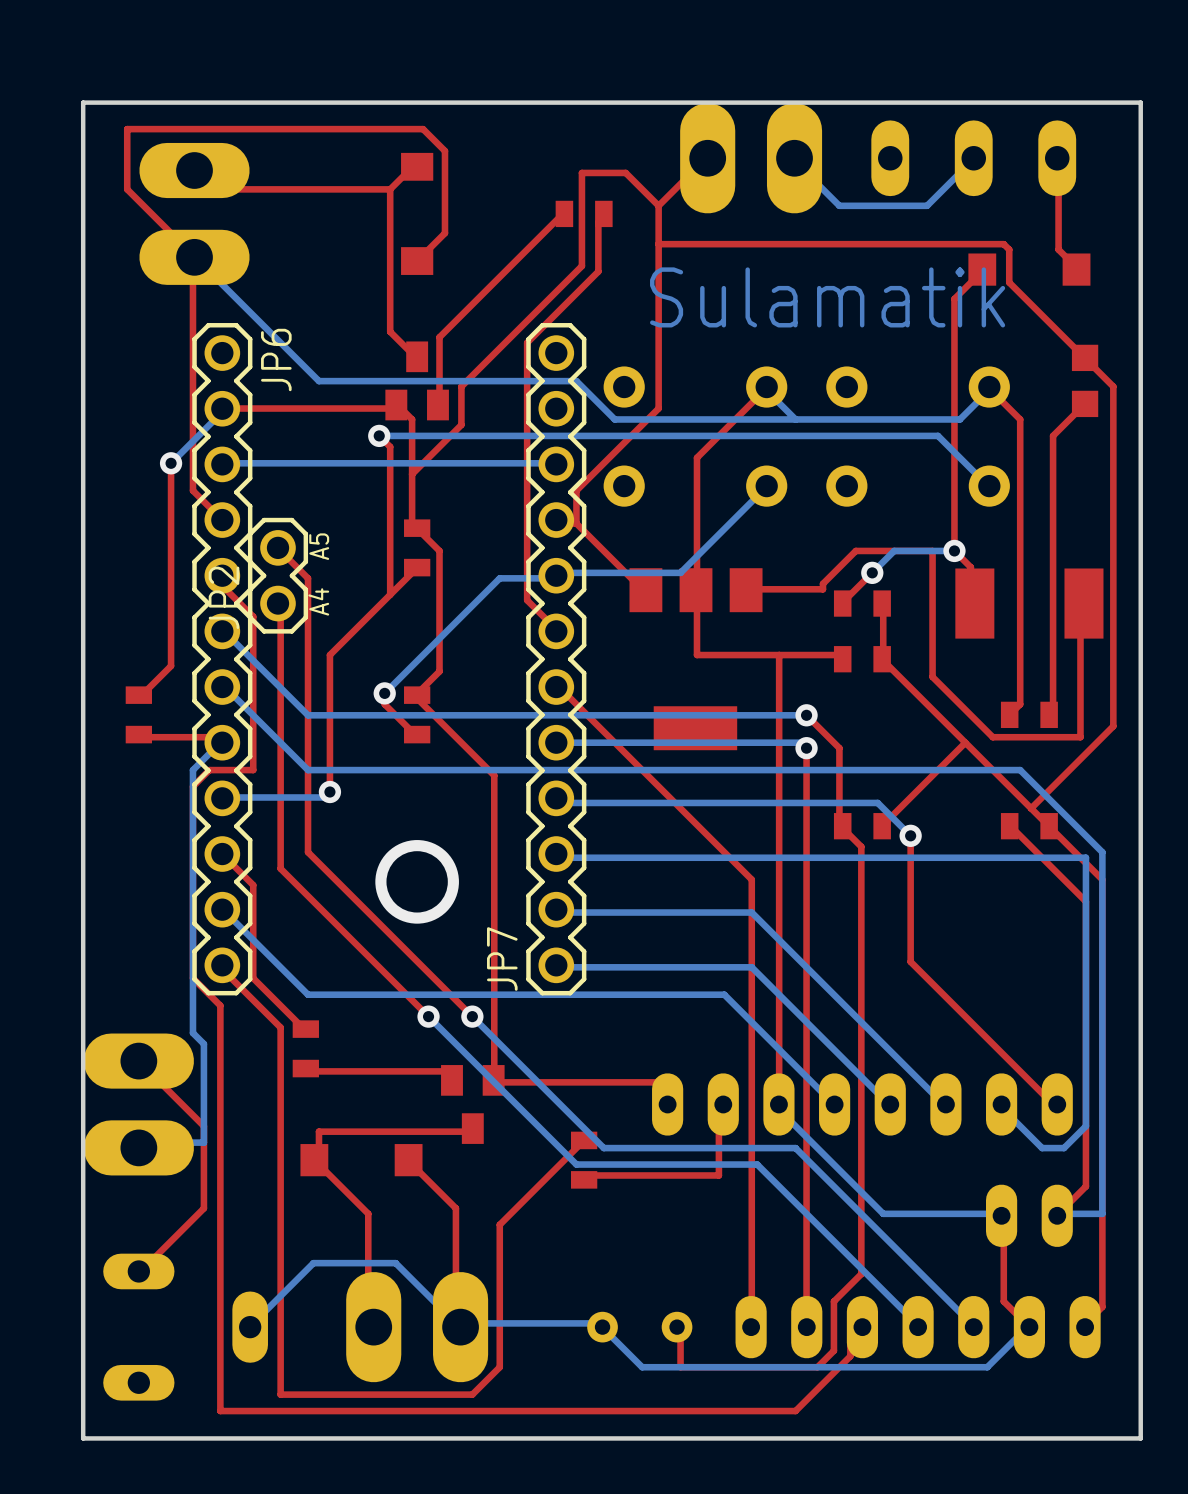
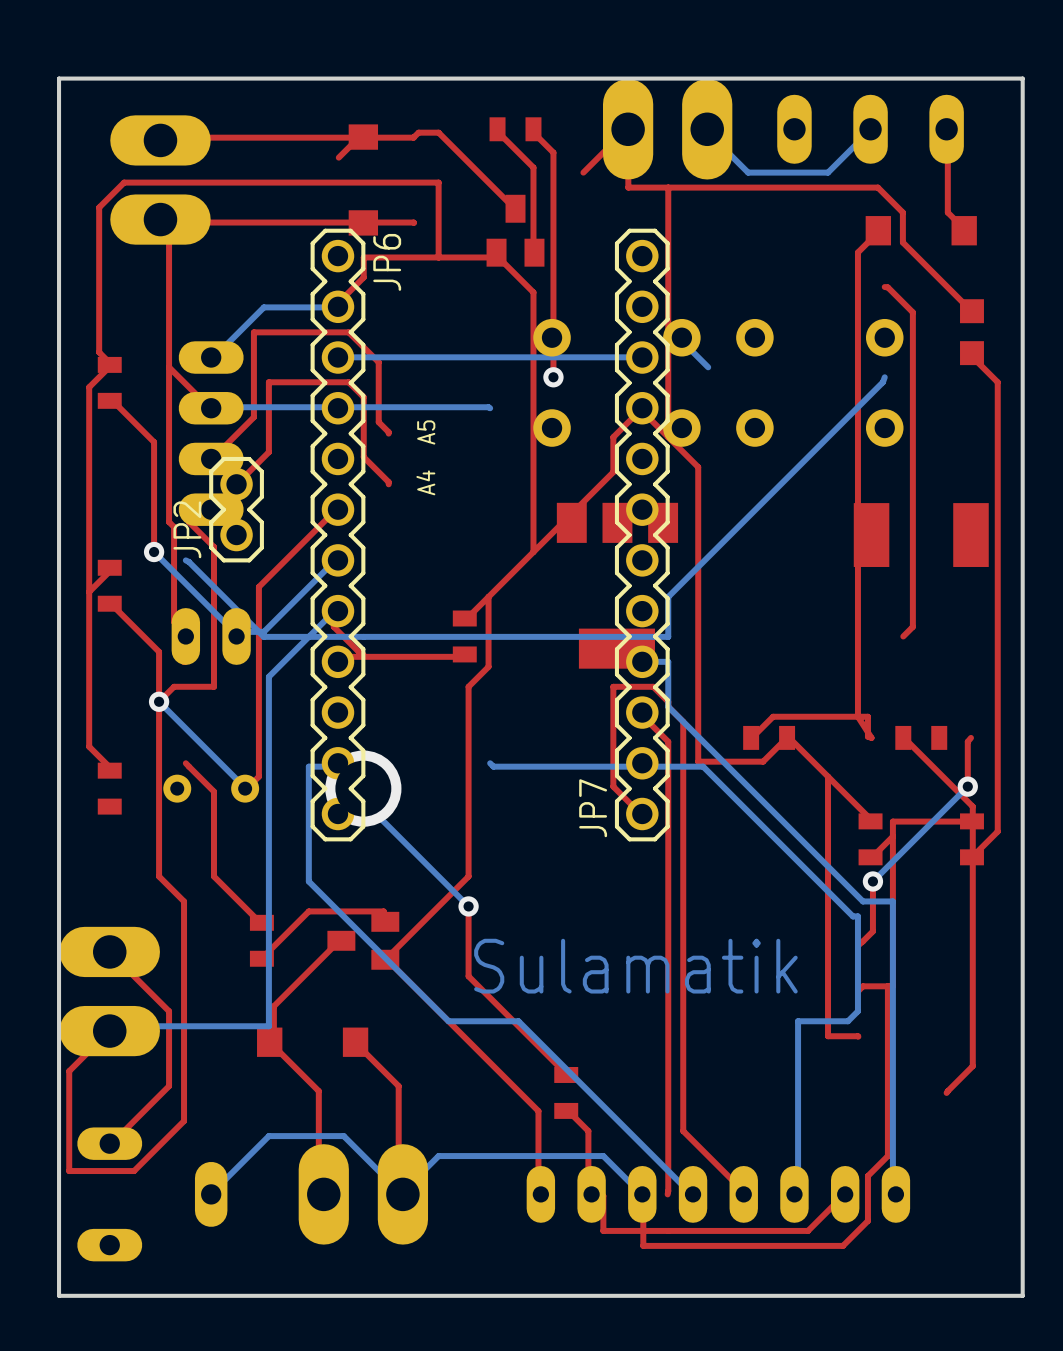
top track: none -> (497, 129) (498, 132) (533, 167) (533, 180)
top track: none -> (533, 129) (533, 132) (553, 152) (553, 377)
top track: (194, 170) (198, 172) (198, 189) (390, 189) (390, 331) (417, 356) -> (160, 140) (164, 137) (413, 137) (418, 132) (438, 132) (515, 208)
top track: (564, 213) (439, 337) (437, 405) -> none
part position: (584, 213) -> (515, 129)
top track: (603, 216) (598, 222) (598, 271) (527, 342) (527, 600) (556, 631) -> (533, 182) (534, 252)
top track: none -> (668, 187) (668, 437)
top track: (1003, 244) (658, 244) -> (897, 207) (877, 187) (628, 187) (628, 129)
bottom track: (194, 257) (318, 381) (576, 381) (614, 419) (959, 419) (987, 392) (989, 387) -> none
top track: (417, 261) (444, 233) (444, 151) (423, 129) (127, 129) (127, 189) (194, 257) (192, 260) (192, 490) (222, 520) -> none
top track: (959, 293) (954, 298) (954, 550) (970, 567) (970, 600) (974, 603) -> (857, 252) (857, 716) (871, 737) (867, 736) (867, 716) (773, 716) (751, 737)
text: Sulamatik (827, 297) -> none
top track: none -> (438, 257) (438, 182) (124, 182) (99, 207) (99, 352) (109, 364) (89, 387) (89, 746) (109, 766) (109, 770)
top track: none -> (337, 306) (338, 302) (363, 277) (363, 257) (493, 257) (496, 252) (498, 257) (533, 292) (533, 552)
bottom track: none -> (337, 306) (263, 307) (213, 357) (211, 357)
top track: (1085, 357) (1113, 386) (1113, 435) -> (971, 353) (972, 357) (997, 382)
part position: (417, 380) -> (515, 230)
top track: (766, 387) (696, 457) (696, 655) (839, 655) (842, 659) -> none
top track: (989, 387) (1020, 419) -> (884, 287) (887, 287) (912, 312) (912, 367)
top track: (1085, 403) (1053, 435) (1053, 709) (1049, 714) -> none
top track: (222, 408) (395, 408) (396, 405) (412, 419) (412, 523) (439, 550) (439, 671) (417, 693) (417, 698) (494, 775) (494, 1082) (664, 1082) (664, 1104) (667, 1104) -> none
bottom track: (222, 408) (220, 413) (171, 463) -> none
bottom track: none -> (642, 357) (337, 357)
top track: none -> (169, 367) (211, 408)
via: none -> (553, 377)
top track: (379, 435) (390, 446) (390, 594) -> none
bottom track: (379, 435) (938, 435) (989, 486) -> none
via: (379, 435) -> none
part: none -> (109, 382)
top track: none -> (109, 400) (114, 402) (154, 442) (154, 552)
top track: (171, 463) (171, 666) (143, 693) (138, 695) -> none
via: (171, 463) -> none
top track: (412, 474) (461, 424) (461, 386) (581, 266) (581, 172) (625, 172) (658, 205) (658, 408) (576, 490) (576, 523) -> none
bottom track: (766, 486) (680, 572) (560, 572) (554, 578) (499, 578) (384, 693) -> none
part: none -> (211, 433)
top track: none -> (388, 433) (378, 422) (378, 362) (348, 332) (253, 332) (253, 417) (211, 458)
top track: (576, 523) (642, 589) (645, 590) -> none
text position: A5 (319, 546) -> A5 (426, 432)
top track: (278, 547) (308, 578) (308, 852) (472, 1016) -> none
part: (417, 547) -> none
top track: none -> (388, 484) (363, 457) (363, 397) (348, 382) (268, 382) (268, 452) (211, 509)
bottom track: (954, 550) (894, 550) (872, 572) -> none
via: (954, 550) -> none
top track: (417, 567) (329, 655) (329, 792) -> none
top track: (872, 572) (842, 603) -> none
via: (872, 572) -> none
top track: none -> (337, 509) (258, 586) (258, 776) (245, 788)
top track: (746, 590) (822, 589) (822, 583) (855, 550) (932, 550) (932, 676) (992, 737) (1080, 737) (1080, 605) (1083, 603) -> none
text position: A4 (318, 601) -> A4 (425, 482)
top track: (278, 603) (280, 605) (280, 868) (428, 1016) -> none
part: (862, 603) -> none
top track: (882, 603) (882, 659) (1102, 879) (1102, 1306) (1085, 1323) (1085, 1327) -> none
bottom track: none -> (154, 552) (236, 636) (238, 631) (263, 631) (333, 561) (337, 560)
via: none -> (154, 552)
top track: none -> (109, 567) (109, 571) (89, 591)
top track: (779, 655) (779, 1104) -> none
JP6 position: (222, 659) -> (337, 535)
JP7 position: (556, 659) -> (642, 535)
part: (862, 659) -> none
top track: none -> (488, 596) (488, 666) (468, 686) (468, 876) (385, 959) (538, 1111) (538, 1191) (540, 1194)
top track: none -> (109, 603) (159, 651) (159, 701)
bottom track: (222, 687) (225, 687) (308, 770) (1020, 770) (1102, 852) (1102, 1213) (1058, 1213) (1057, 1215) -> none
top track: (556, 687) (560, 687) (751, 879) -> (642, 712) (643, 716) (668, 741) (668, 786)
via: (384, 693) -> none
top track: none -> (464, 618) (468, 616) (613, 472) (613, 437) (642, 408) (643, 412) (698, 467) (698, 761) (763, 761) (787, 737)
part position: (138, 714) -> (109, 585)
part: none -> (211, 636)
part: (417, 714) -> none
part: none -> (464, 636)
part: (1029, 714) -> none
top track: (806, 715) (839, 748) (839, 824) (861, 846) (861, 1274) (833, 1301) (833, 1350) (817, 1367) -> (845, 1194) (808, 1230) (728, 1230)
bottom track: (806, 715) (751, 715) -> (884, 377) (882, 382) (668, 596) (668, 636)
via: (806, 715) -> none
top track: (1113, 726) (1031, 808) -> (997, 646) (997, 831) (971, 857)
top track: (138, 734) (143, 737) (220, 737) -> (414, 222) (413, 222) (164, 222) (160, 219) (169, 222) (169, 522) (174, 527) (174, 621) (185, 636) (184, 636) (184, 656)
top track: none -> (464, 654) (463, 656) (338, 656) (337, 661)
bottom track: (222, 742) (192, 770) (192, 1033) (203, 1044) (203, 1142) -> (337, 611) (333, 611) (268, 676) (268, 1026) (169, 1026)
bottom track: (723, 742) (556, 742) -> none
bottom track: (751, 742) (801, 742) (806, 748) -> (668, 661) (668, 706) (862, 901) (892, 901) (892, 1191) (895, 1194)
top track: (965, 742) (883, 824) -> (870, 821) (788, 736)
top track: (806, 748) (806, 1327) -> none
via: (806, 748) -> none
bottom track: none -> (159, 701) (245, 788)
via: none -> (159, 701)
bottom track: (329, 792) (324, 797) (222, 798) -> none
via: (329, 792) -> none
bottom track: (556, 798) (560, 802) (877, 802) (910, 835) -> none
top track: none -> (970, 737) (967, 741) (967, 786)
top track: (910, 835) (910, 961) (1053, 1104) (1057, 1104) -> none
via: (910, 835) -> none
bottom track: none -> (337, 763) (333, 766) (308, 766) (308, 881) (448, 1021) (518, 1021) (693, 1194)
bottom track: (790, 857) (1085, 857) (1085, 1126) (1064, 1148) (1042, 1148) (1003, 1109) (1001, 1104) -> (703, 766) (852, 916) (857, 916) (857, 1011) (847, 1021) (798, 1021) (798, 1191) (794, 1194)
top track: none -> (828, 776) (828, 1036) (858, 1036)
bottom track: none -> (967, 786) (872, 881)
via: none -> (967, 786)
part: none -> (109, 788)
part: none -> (211, 788)
bottom track: (222, 909) (308, 994) (724, 994) (834, 1104) -> none
bottom track: none -> (337, 813) (338, 816) (378, 816) (468, 906)
bottom track: (556, 909) (560, 912) (751, 912) (943, 1104) (945, 1104) -> none
top track: none -> (642, 813) (613, 786) (613, 686) (653, 686) (668, 701) (668, 706) (683, 721) (683, 1131) (743, 1191) (743, 1194)
top track: none -> (971, 821) (892, 821) (892, 986) (862, 986) (858, 991)
top track: none -> (892, 836) (870, 857)
part: none -> (870, 839)
part: none -> (971, 839)
top track: (222, 965) (225, 967) (225, 972) (280, 1027) (280, 1394) (472, 1394) (499, 1367) (499, 1224) (584, 1140) -> none
bottom track: (556, 965) (560, 967) (751, 967) (890, 1104) -> none
top track: none -> (872, 881) (872, 931) (858, 945)
via: none -> (872, 881)
top track: none -> (468, 906) (468, 976) (566, 1074)
via: none -> (468, 906)
bottom track: (428, 1016) (576, 1164) (757, 1164) (918, 1327) -> none
via: (428, 1016) -> none
bottom track: (472, 1016) (603, 1148) (795, 1148) (973, 1327) -> none
via: (472, 1016) -> none
top track: (305, 1068) (308, 1071) (450, 1071) (451, 1080) -> (261, 958) (308, 911) (383, 911) (383, 921) (385, 921)
text: none -> Sulamatik (635, 966)
top track: none -> (887, 986) (887, 1156) (867, 1176) (867, 1220) (842, 1245) (643, 1245) (642, 1194)
part rotation: 0° (472, 1104) -> 90° clockwise (363, 940)
part position: (472, 1104) -> (363, 940)
top track: (723, 1104) (718, 1109) (718, 1175) (587, 1175) (584, 1179) -> none
bottom track: (778, 1104) (779, 1109) (883, 1213) (998, 1213) (1001, 1215) -> none
part position: (862, 1104) -> (718, 1194)
top track: (472, 1128) (472, 1131) (318, 1131) -> (341, 940) (273, 1006) (273, 1016)
part position: (584, 1160) -> (566, 1092)
top track: (1001, 1215) (1003, 1219) (1003, 1301) (1029, 1327) -> none
part: (1029, 1215) -> none
top track: none -> (566, 1110) (588, 1131) (588, 1191) (591, 1194)
top track: (220, 1246) (220, 1411) (795, 1411) (850, 1356) (850, 1339) (862, 1327) -> (184, 1121) (134, 1171) (69, 1171) (69, 1071) (109, 1031)
bottom track: (461, 1323) (598, 1323) (642, 1367) (987, 1367) (1029, 1327) -> (403, 1191) (438, 1156) (603, 1156) (642, 1194)
part: (639, 1327) -> none
part: (918, 1327) -> none

